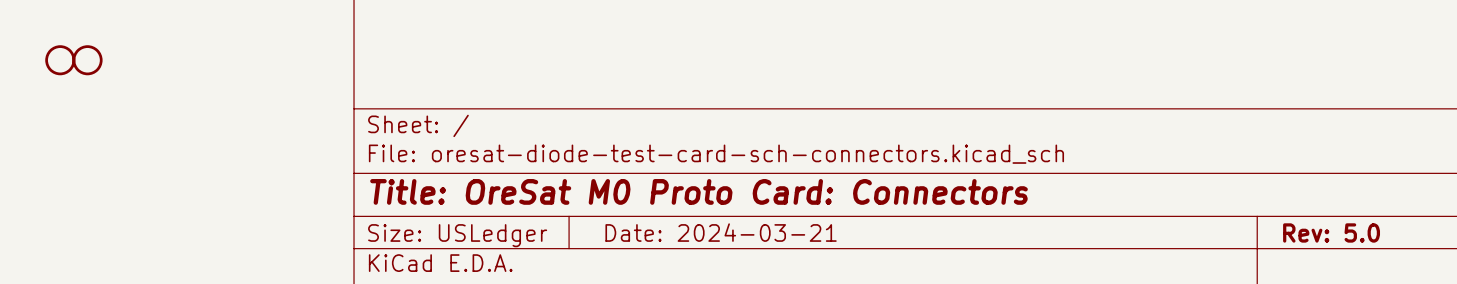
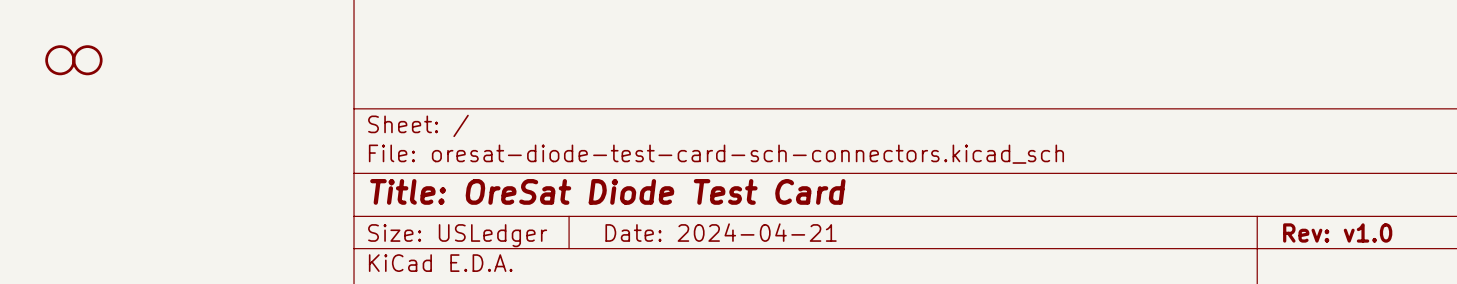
title block: Title: OreSat M0 Proto Card: Connectors (699, 191) -> Title: OreSat Diode Test Card (607, 191)
title block: Date: 2024-03-21 (721, 232) -> Date: 2024-04-21 (721, 232)
title block: Rev: 5.0 (1331, 232) -> Rev: v1.0 (1337, 232)

